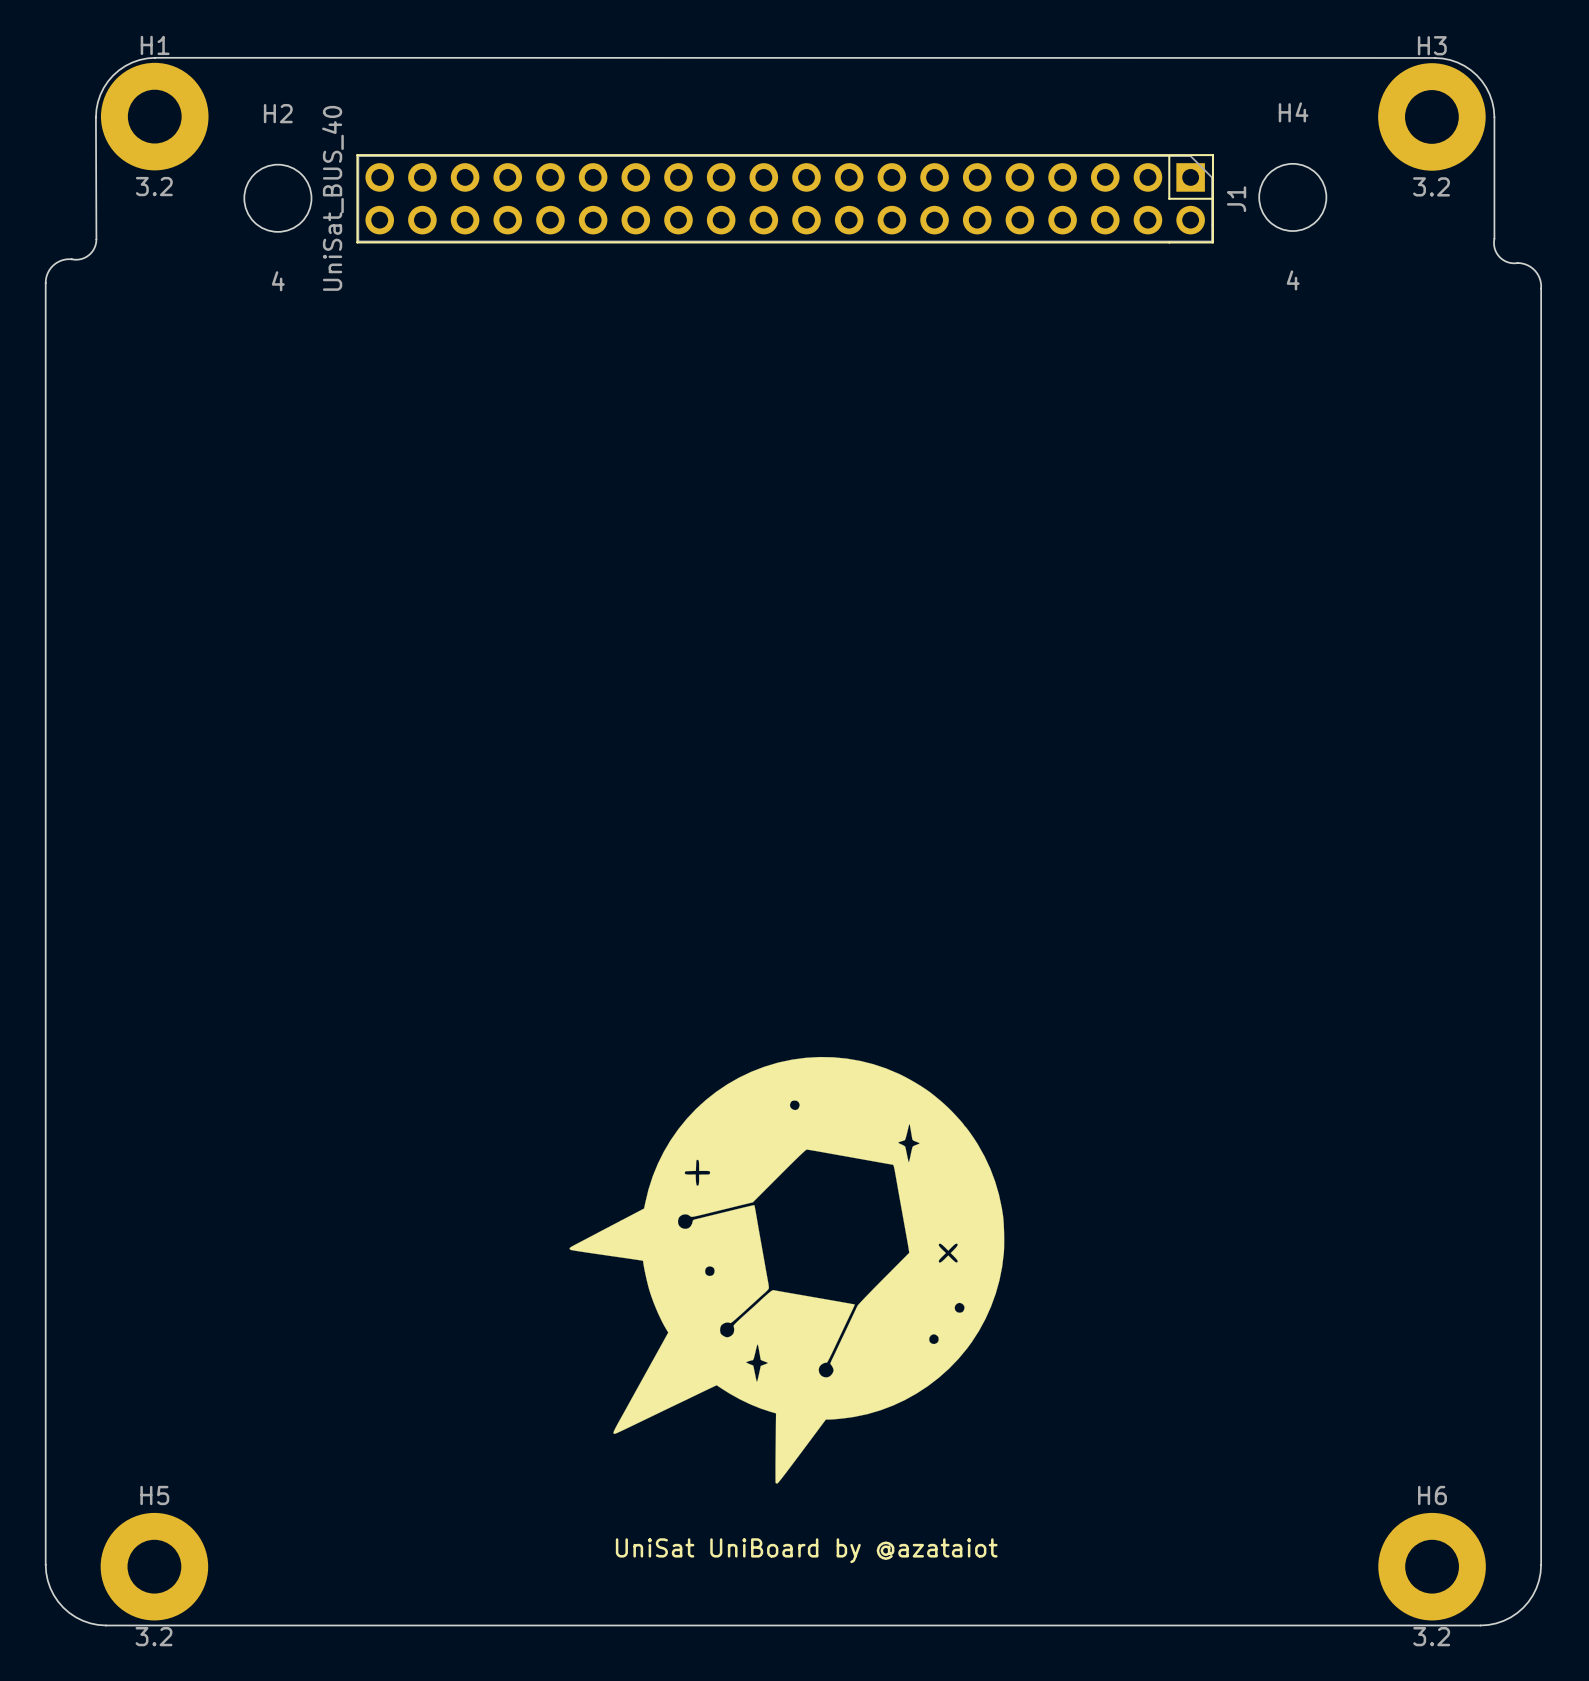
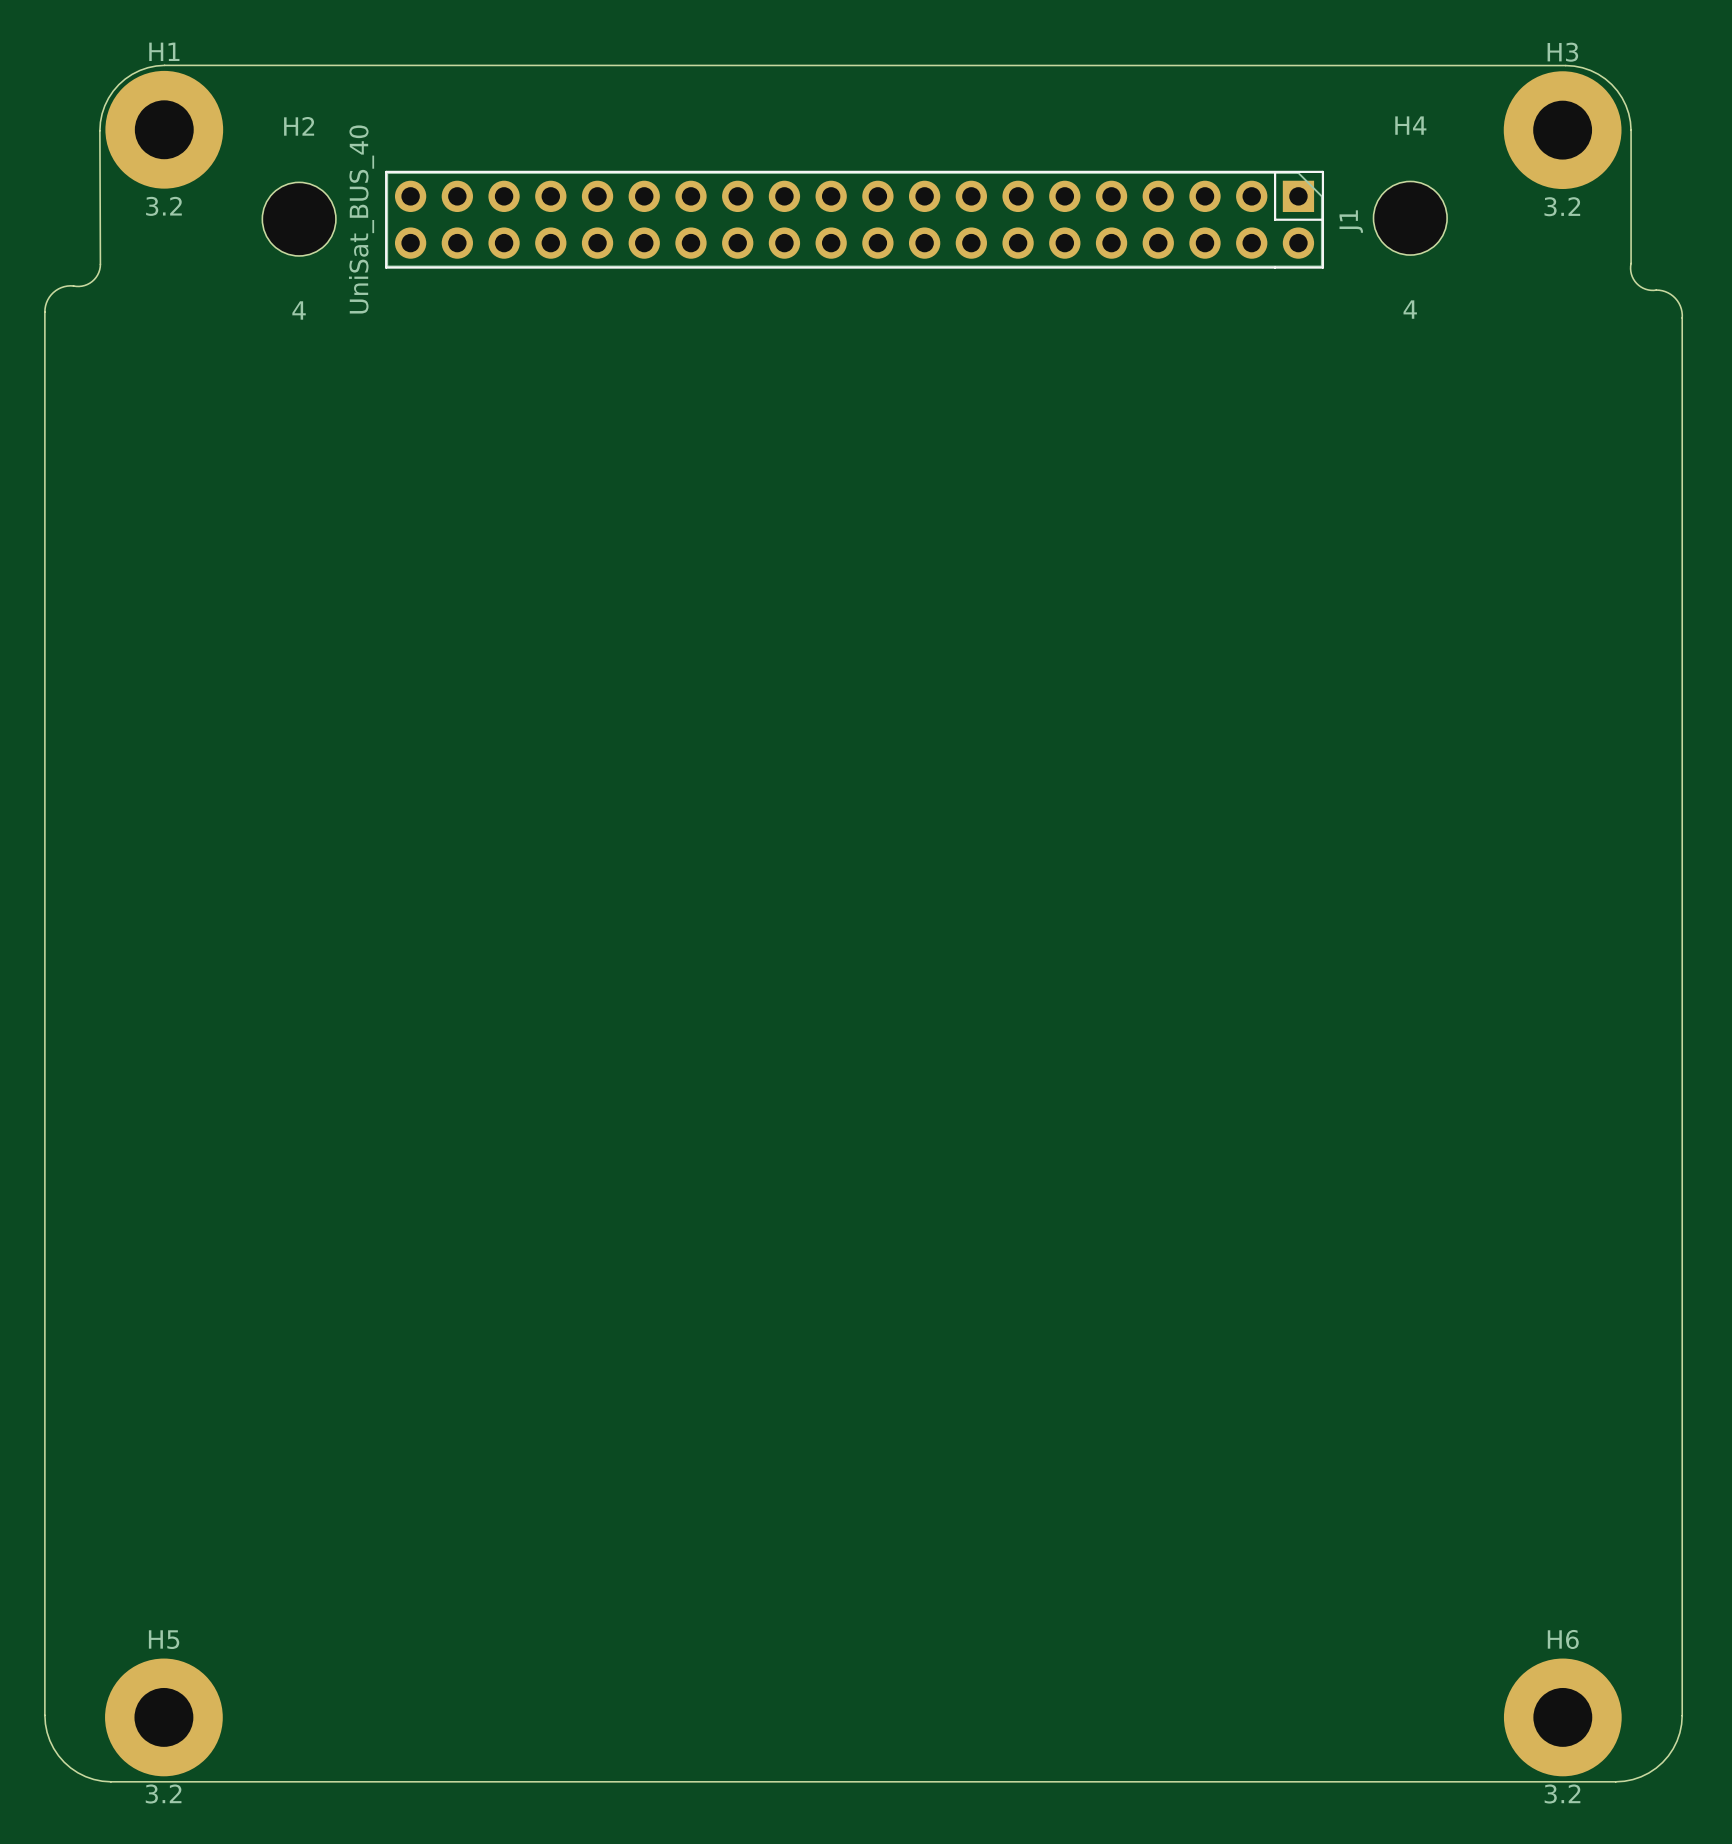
drawing: [569, 1056, 1005, 1484] -> none
text: UniSat UniBoard by @azataiot (806, 1550) -> none

